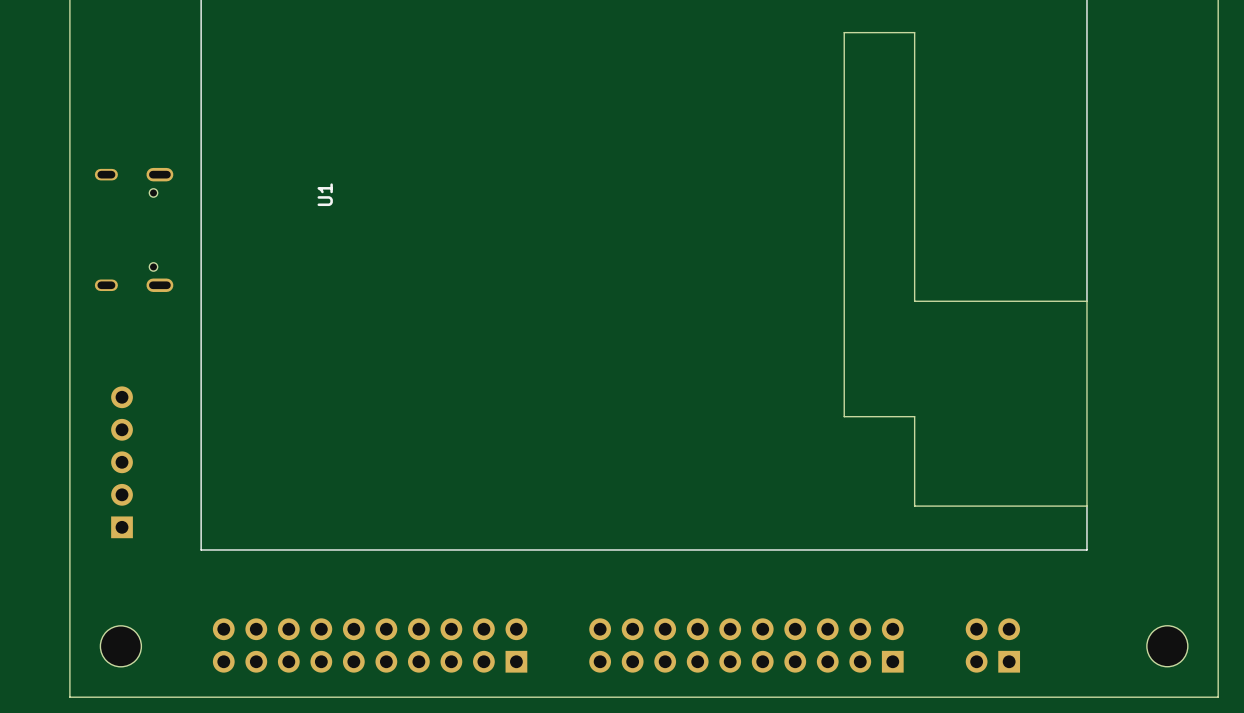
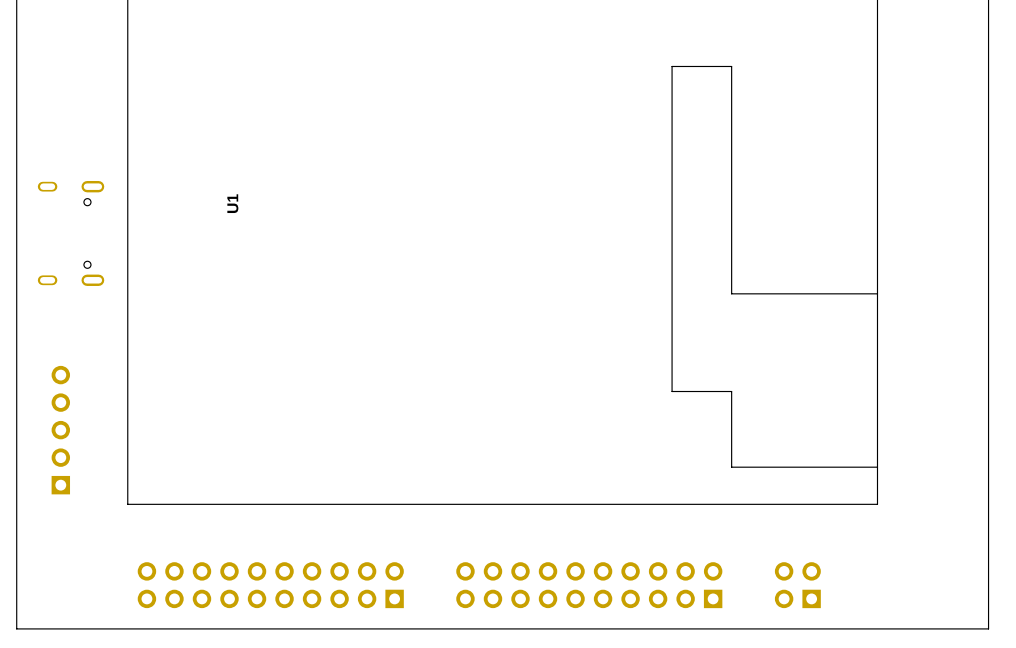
part: (120, 646) -> none
part: (1167, 646) -> none

